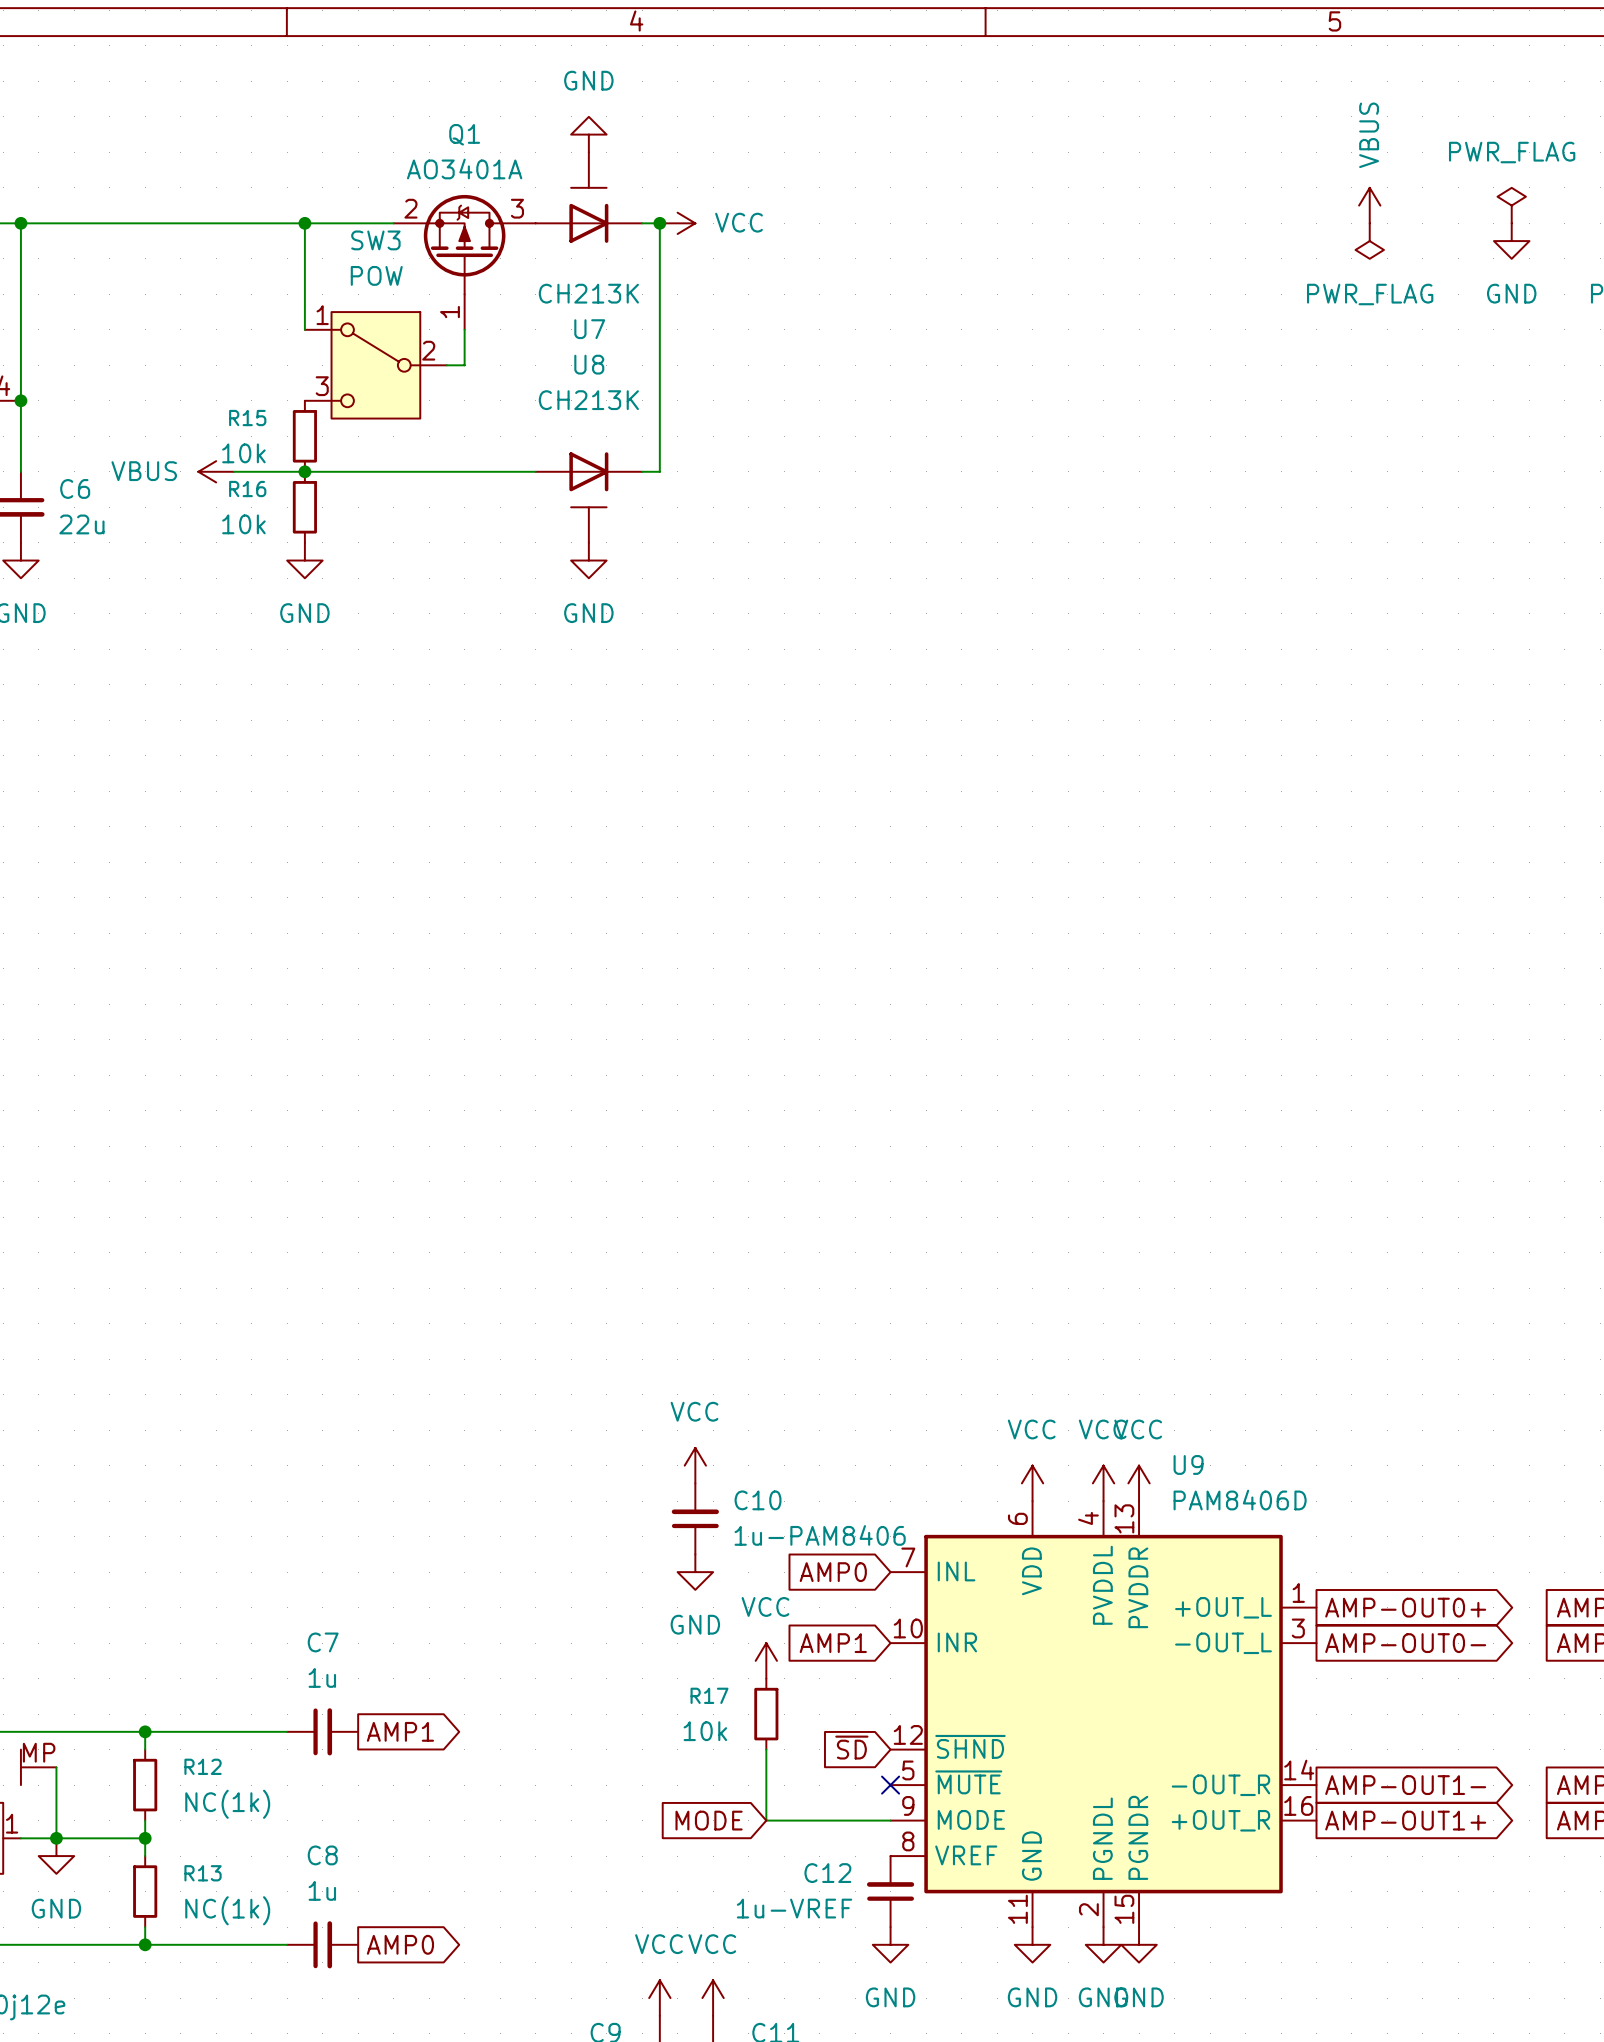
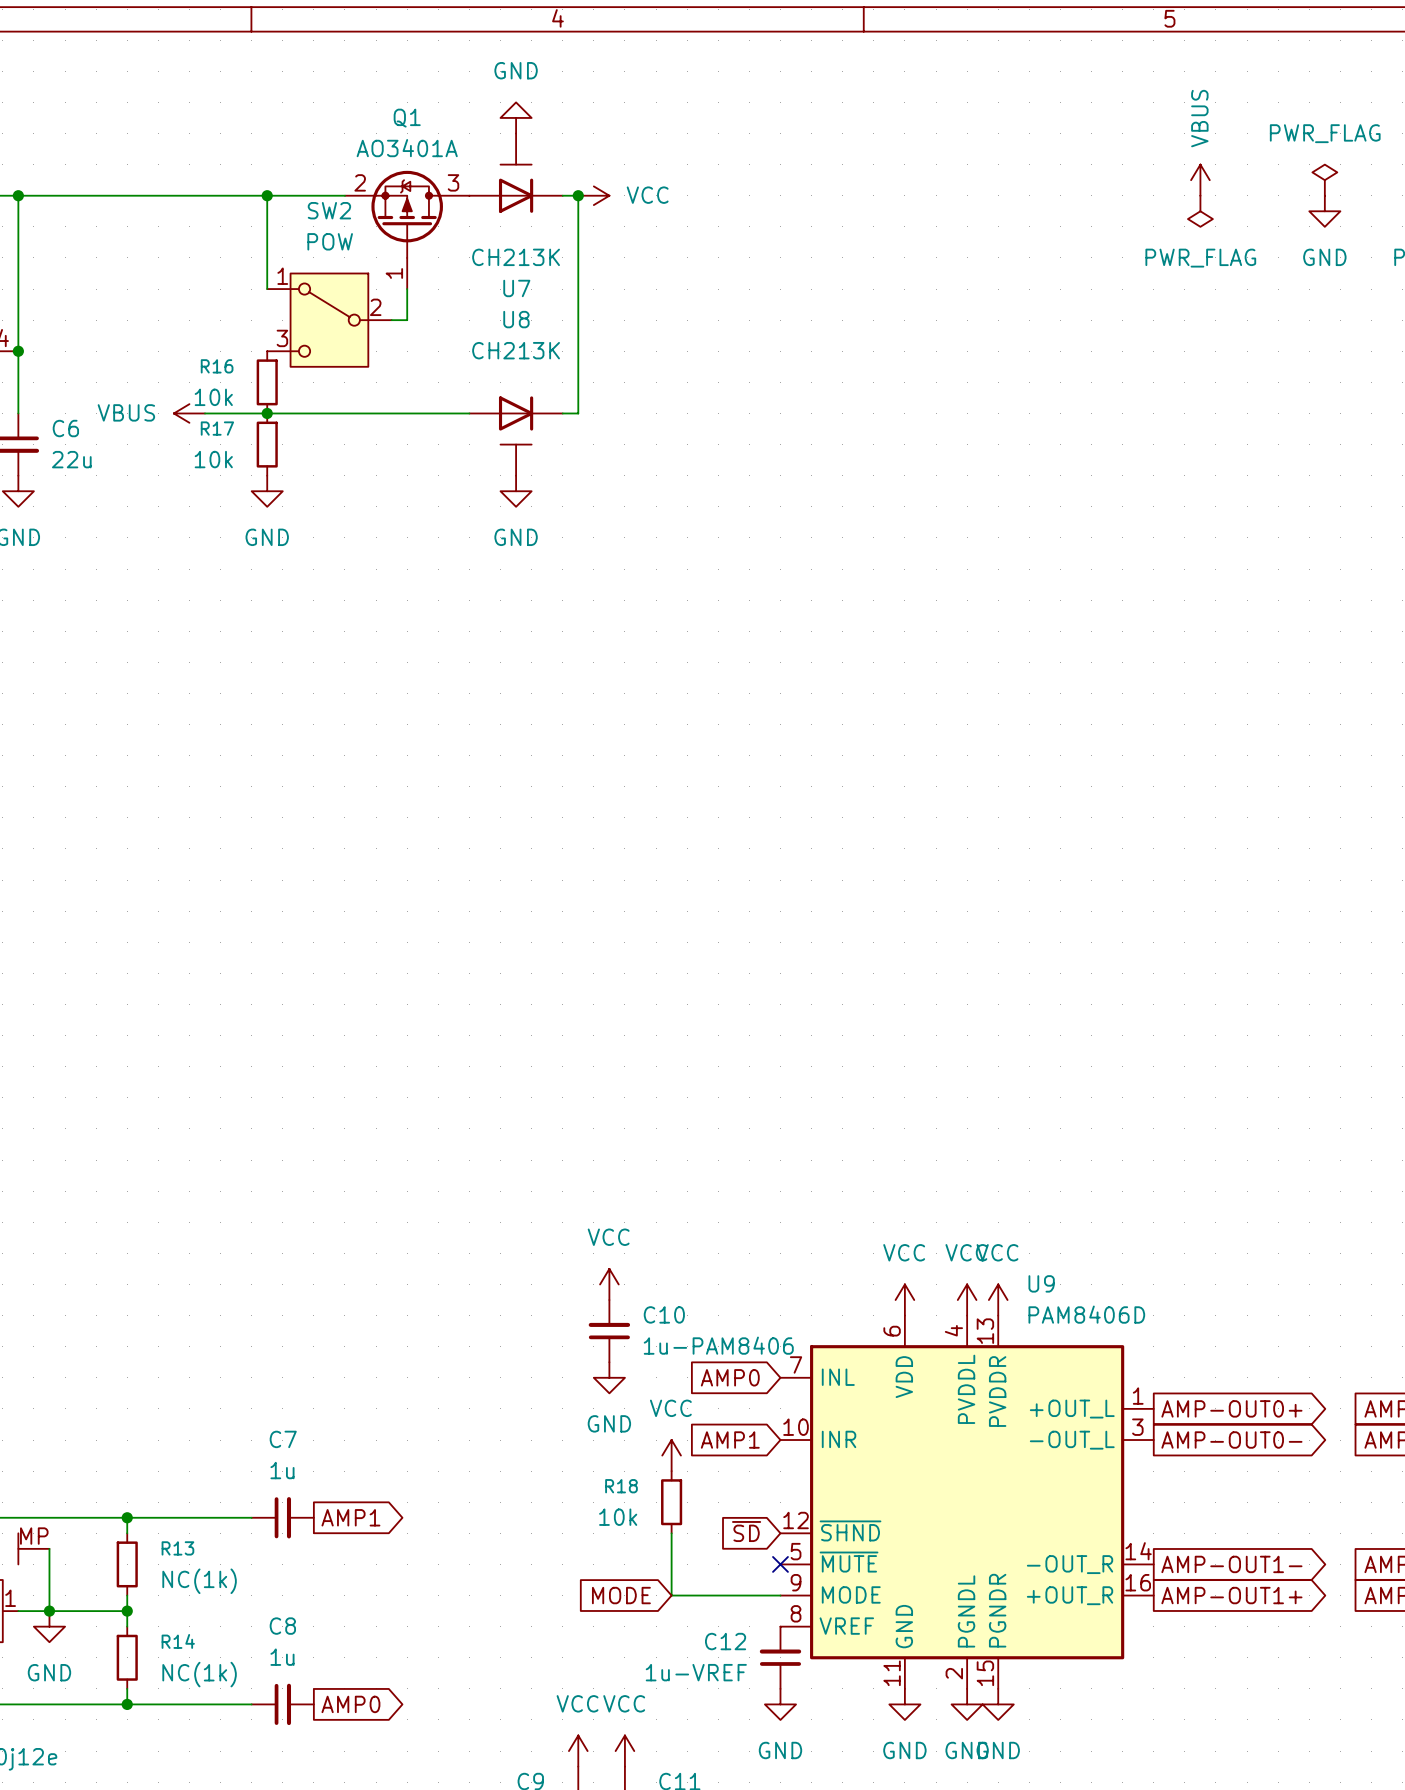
SW3 name: SW3 (375, 240) -> SW2 (329, 210)
R15 name: R15 (247, 418) -> R16 (217, 366)
R16 name: R16 (247, 489) -> R17 (217, 428)
R17 name: R17 (709, 1695) -> R18 (621, 1486)
R12 name: R12 (203, 1766) -> R13 (177, 1548)
R13 name: R13 (203, 1873) -> R14 (178, 1641)

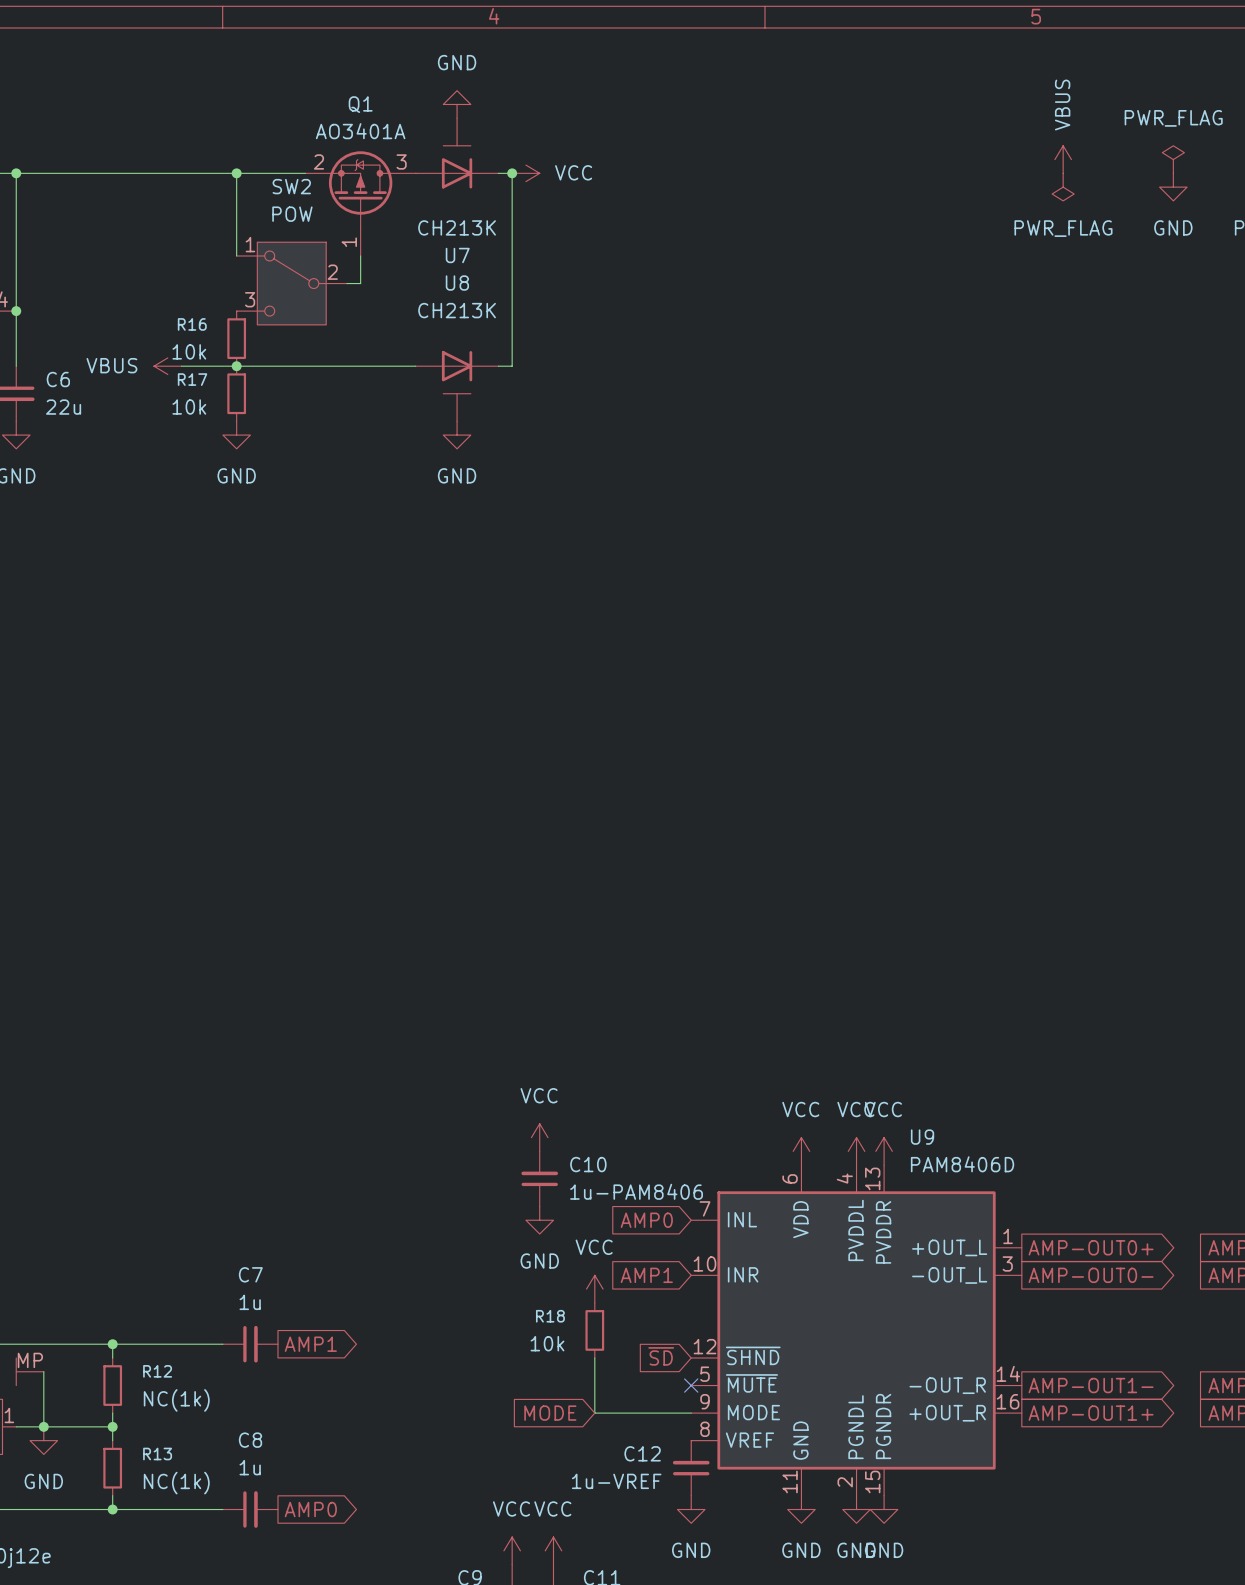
R13 name: R13 (177, 1548) -> R12 (157, 1371)
R14 name: R14 (178, 1641) -> R13 (157, 1454)

